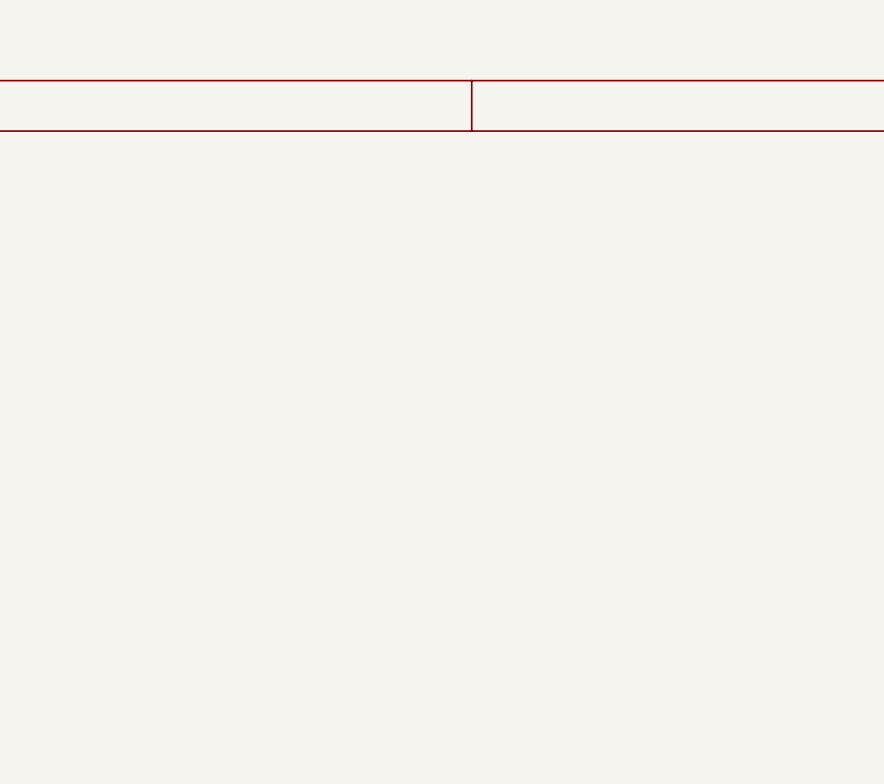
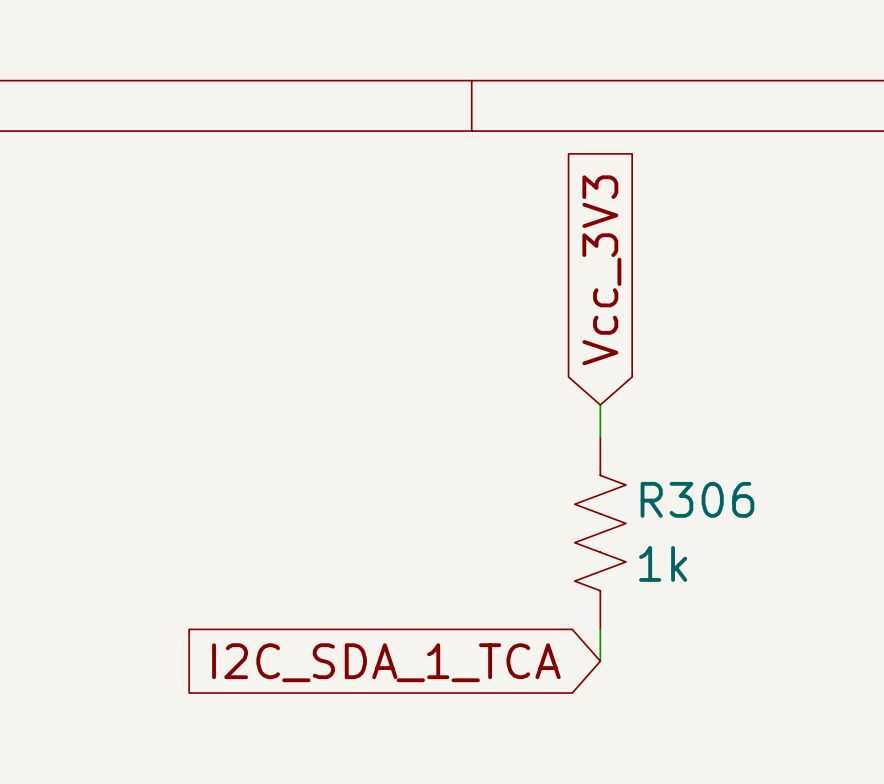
global label: none -> Vcc_3V3 (601, 270)
wire: none -> (600, 404) (600, 436)
R306: none -> 1k (600, 533)
wire: none -> (600, 629) (600, 661)
global label: none -> I2C_SDA_1_TCA (386, 662)

